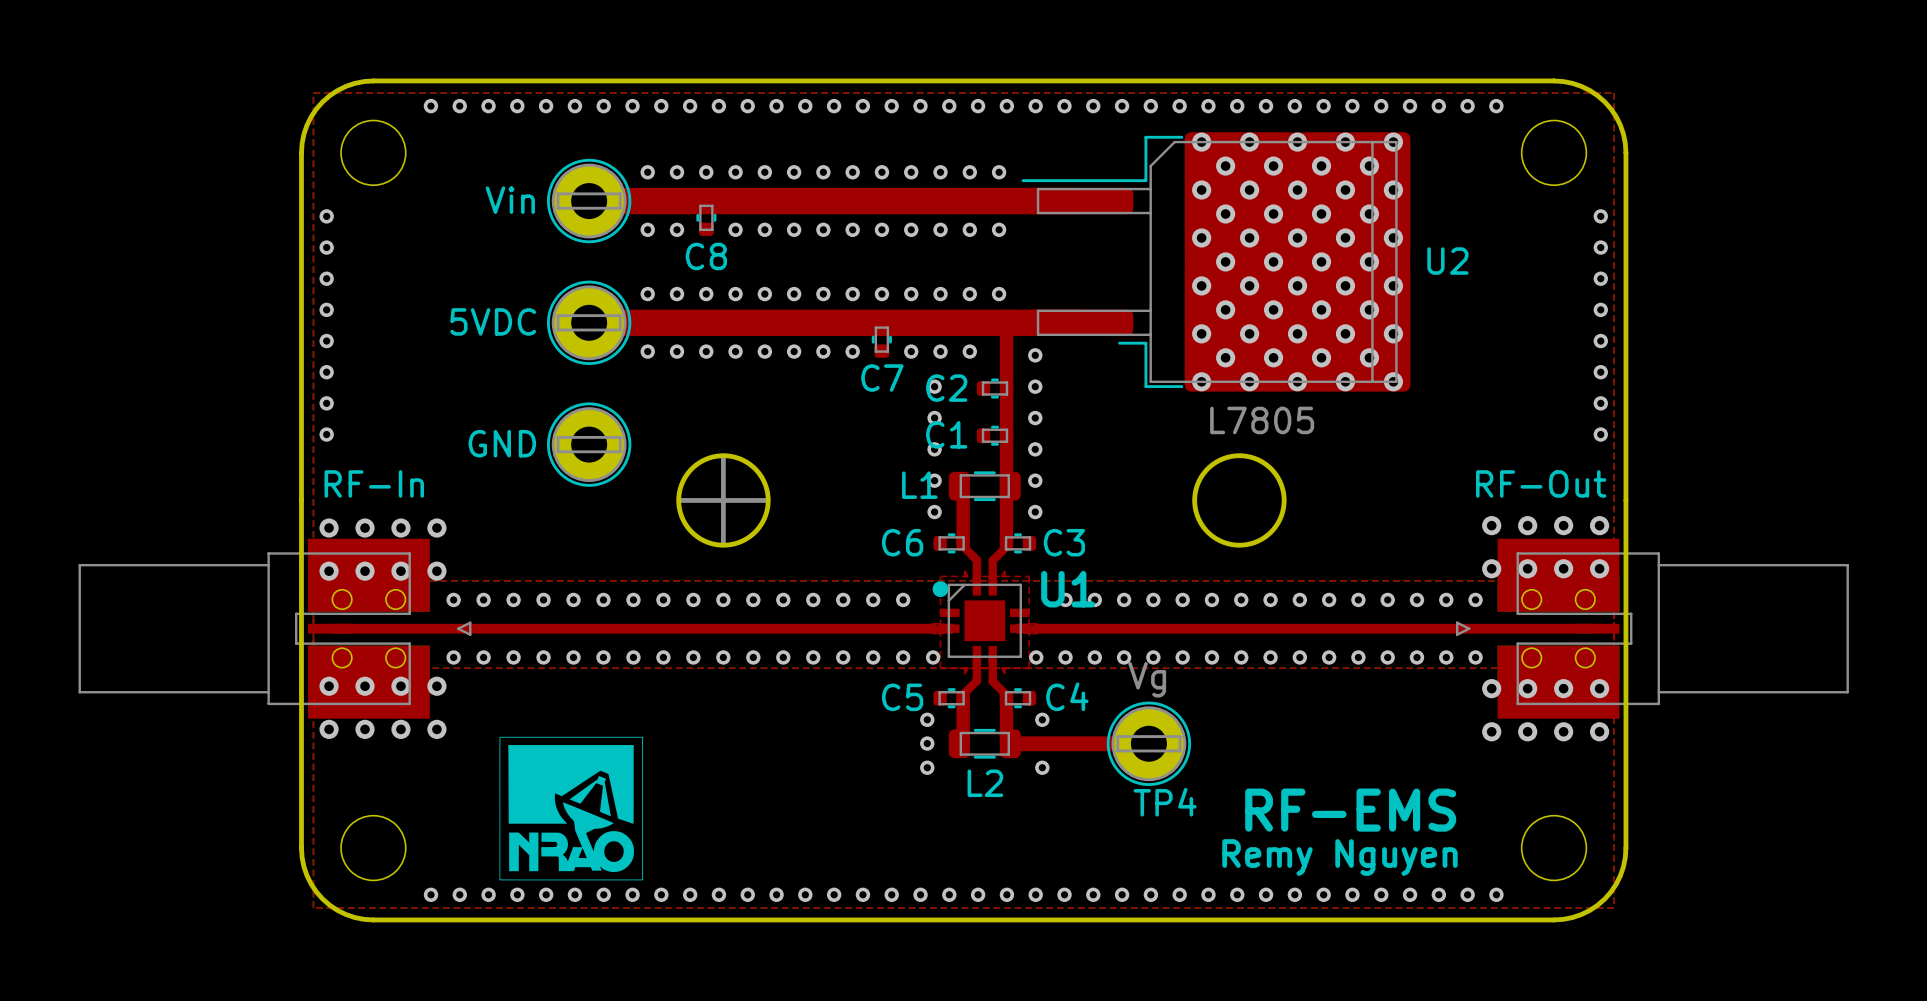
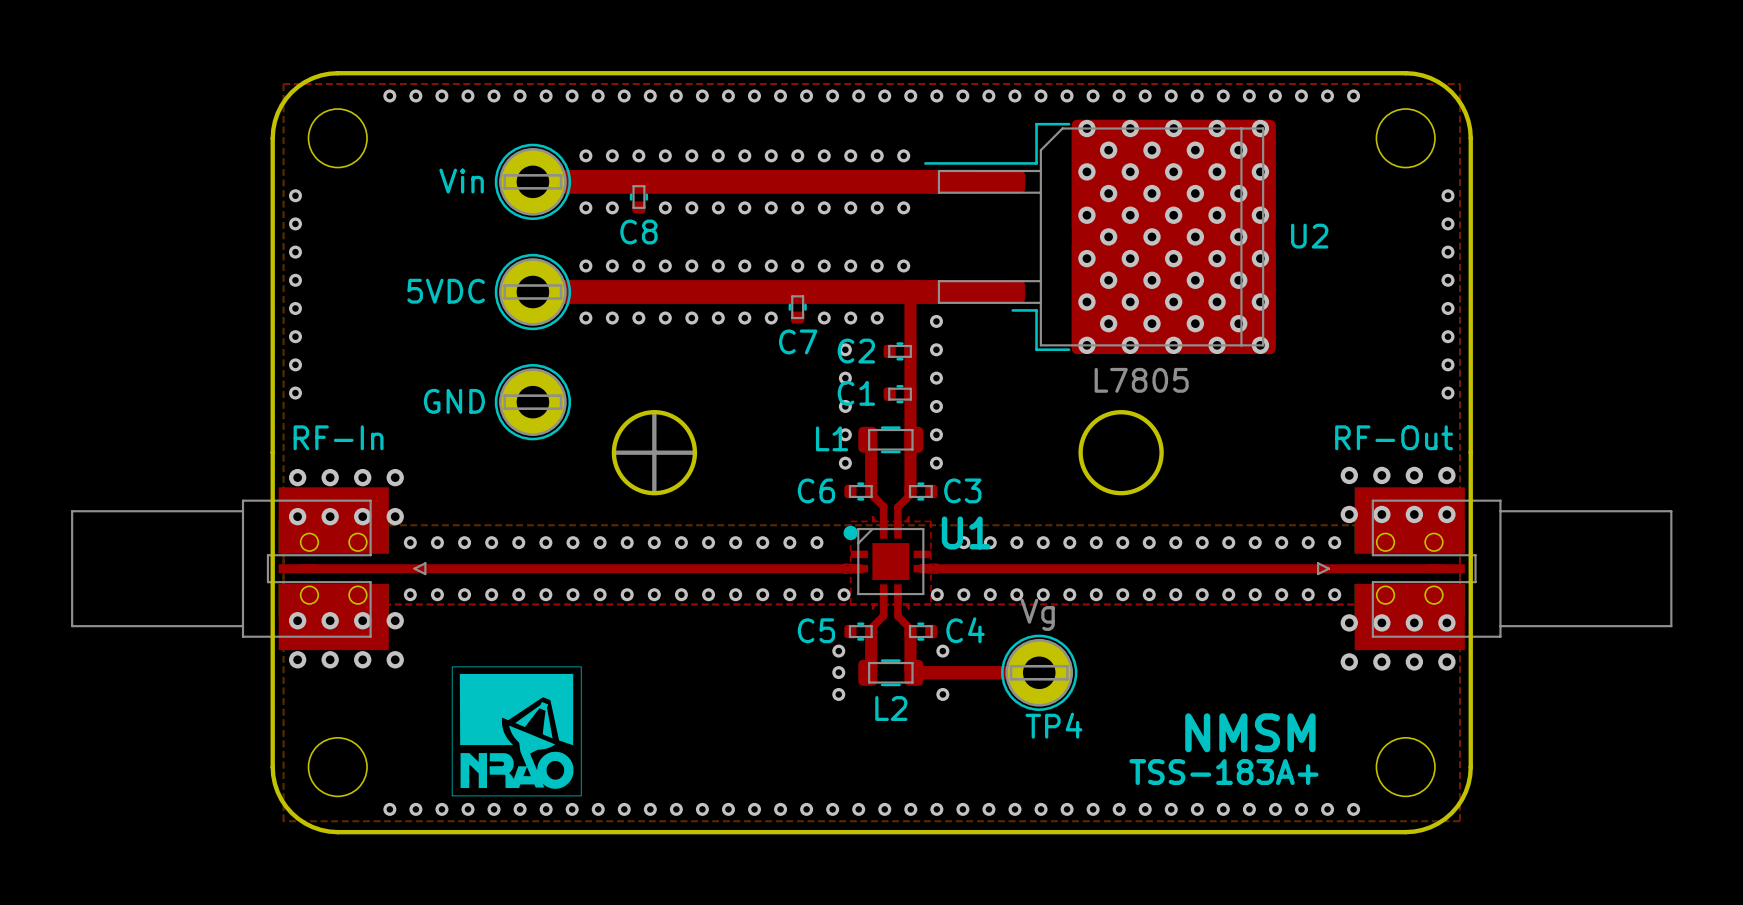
text: RF-EMS (1350, 810) -> NMSM (1250, 732)
text: Remy Nguyen (1339, 857) -> TSS-183A+ (1223, 772)

